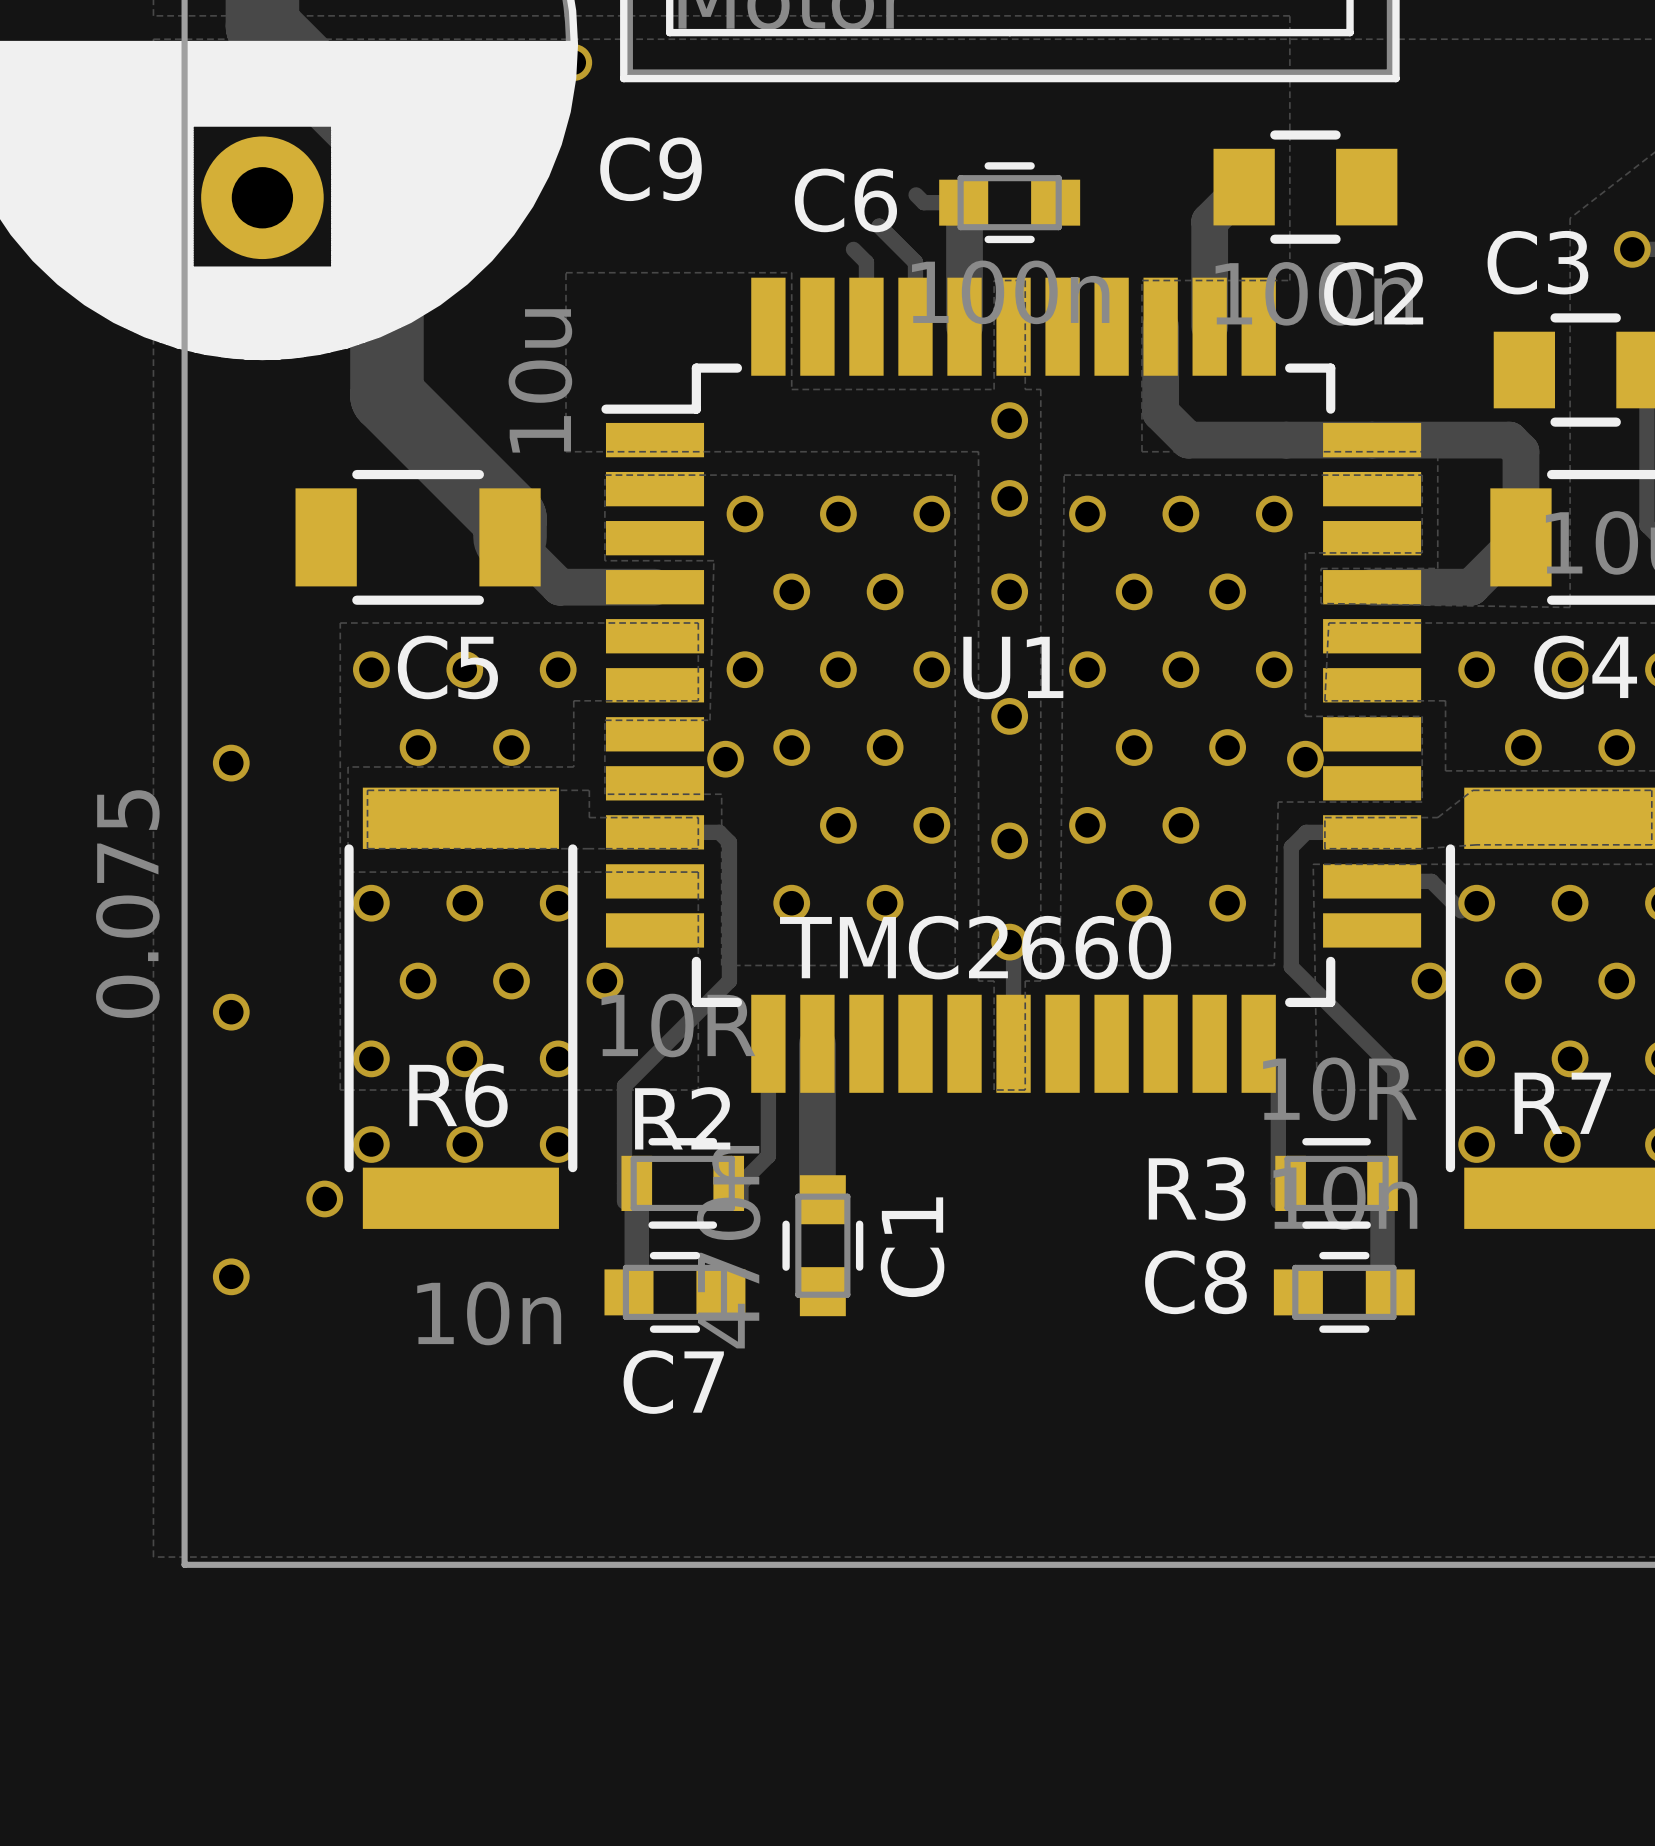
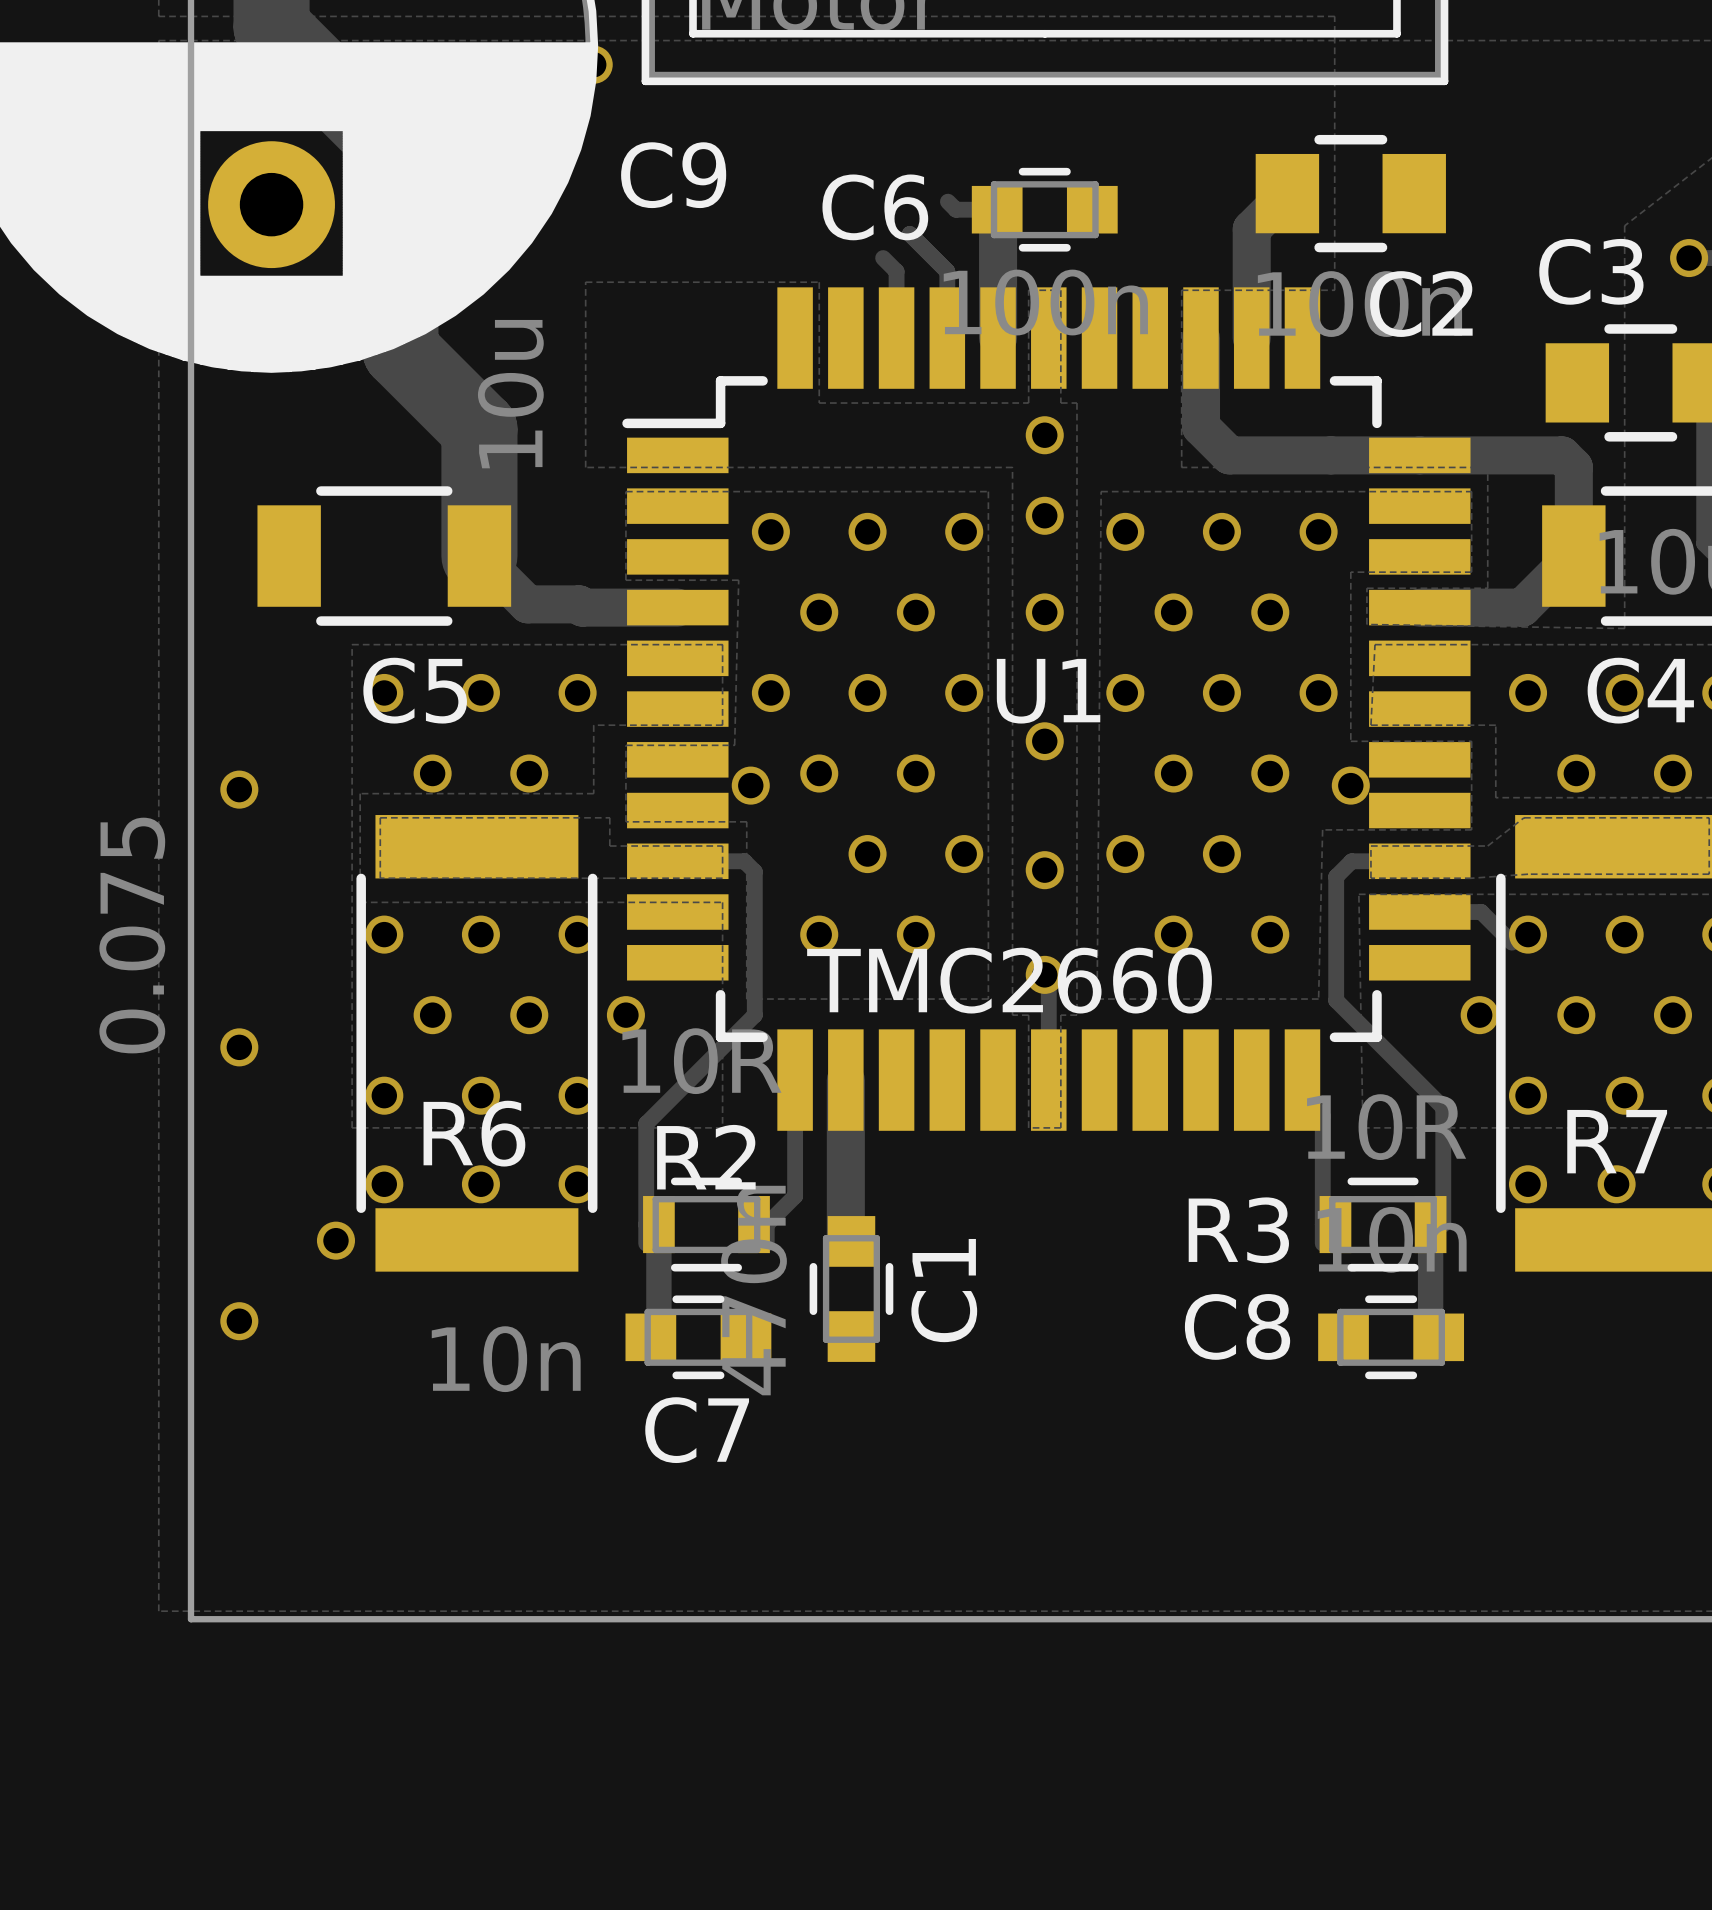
track: (386, 338) (386, 395) (510, 518) (510, 537) (559, 587) (562, 587) -> (400, 350) (479, 429) (479, 556) (527, 604) (579, 604) (582, 607)
C5 position: (418, 537) -> (384, 556)

